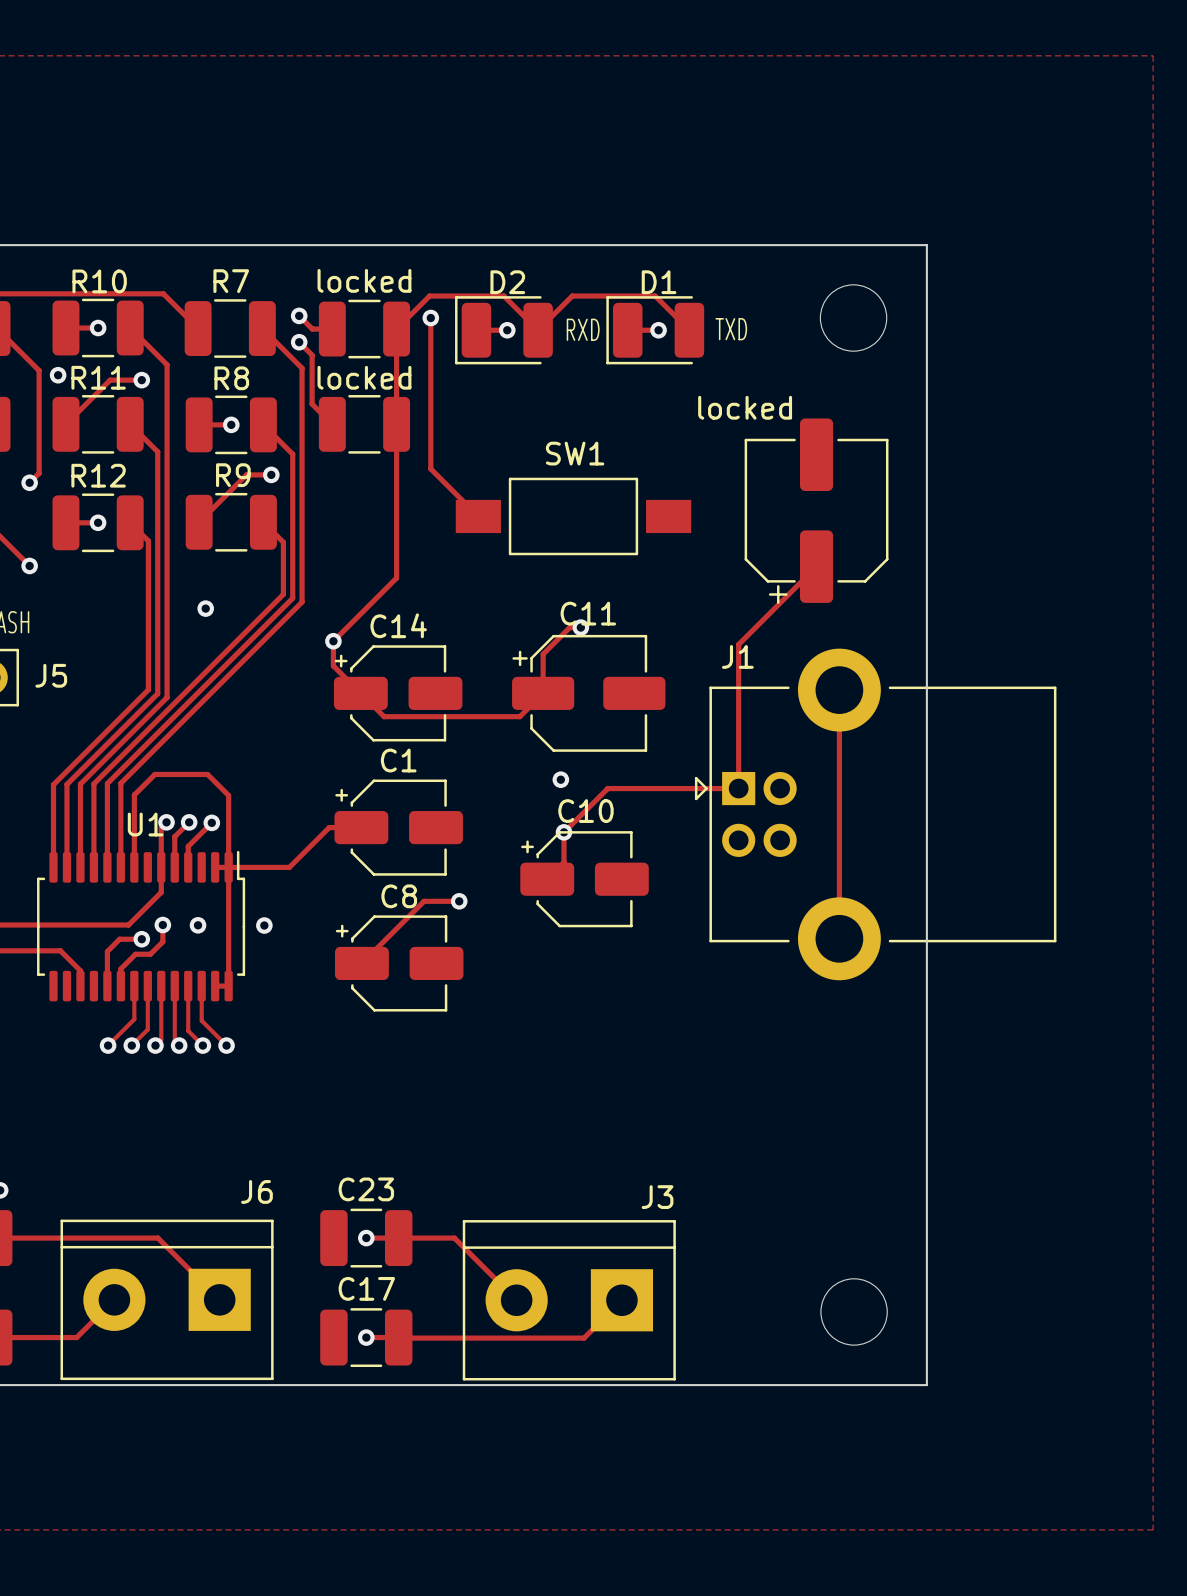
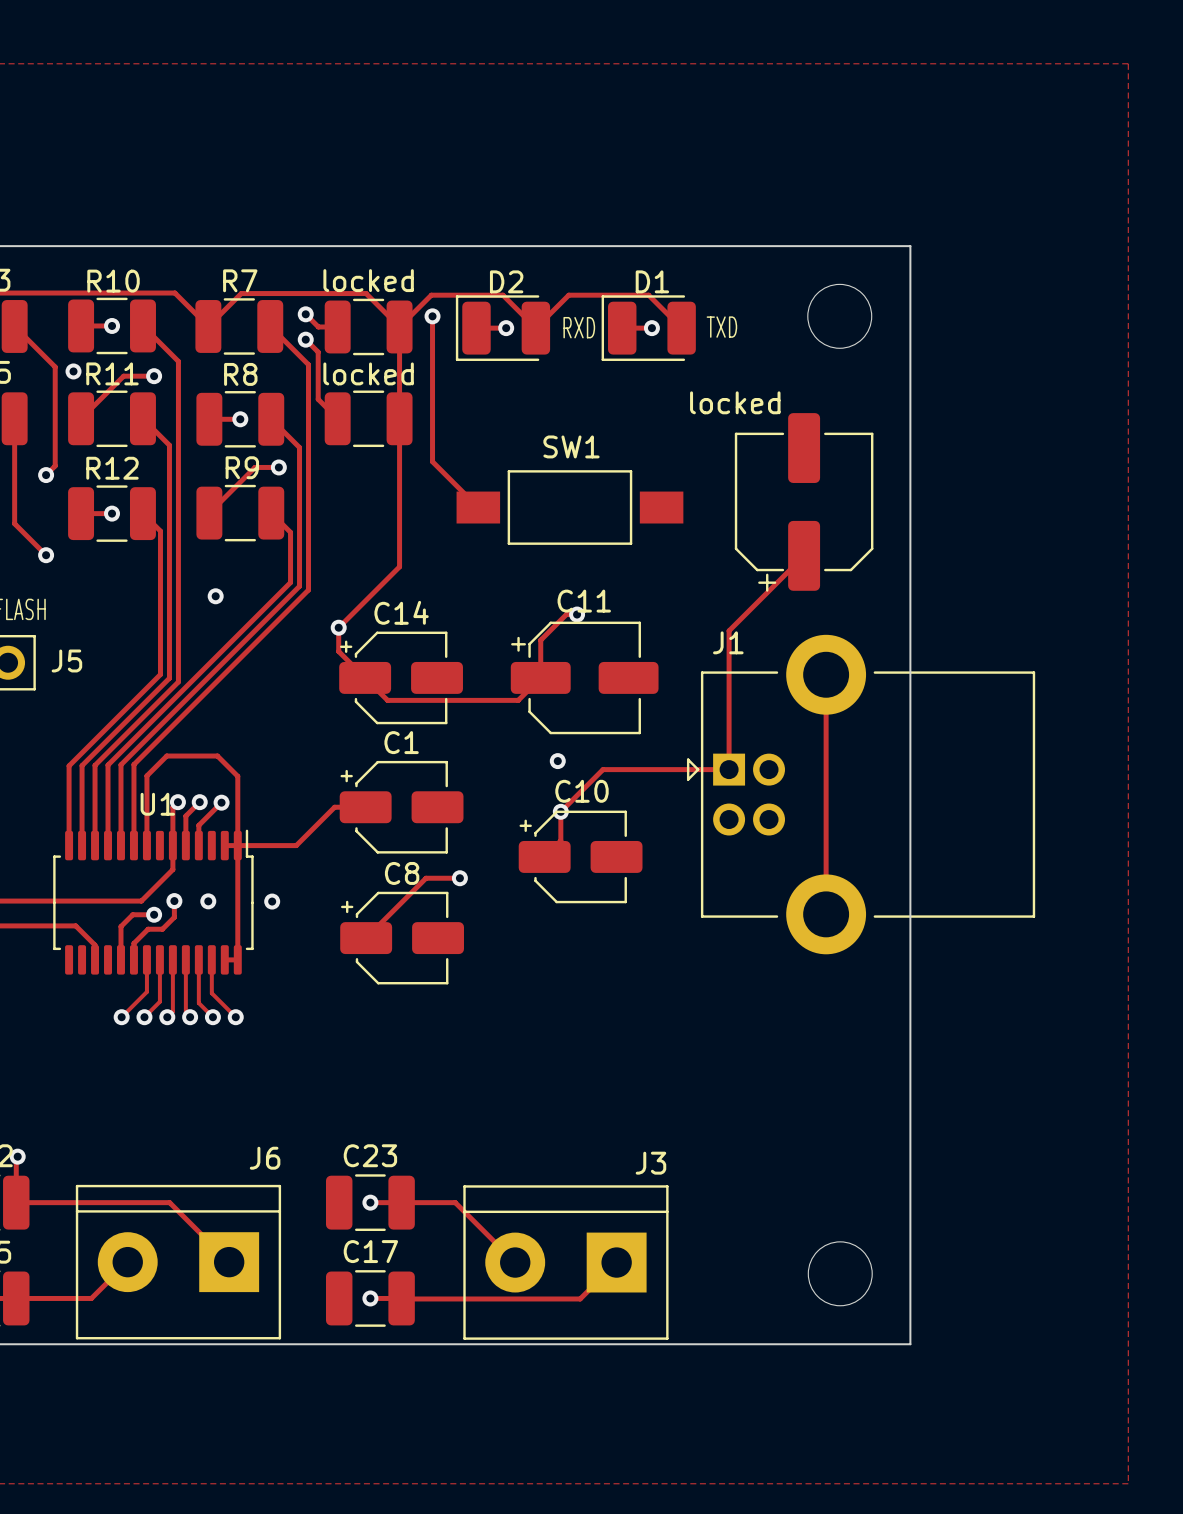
track: none -> (208, 326) (241, 293) (366, 293) (399, 326)

